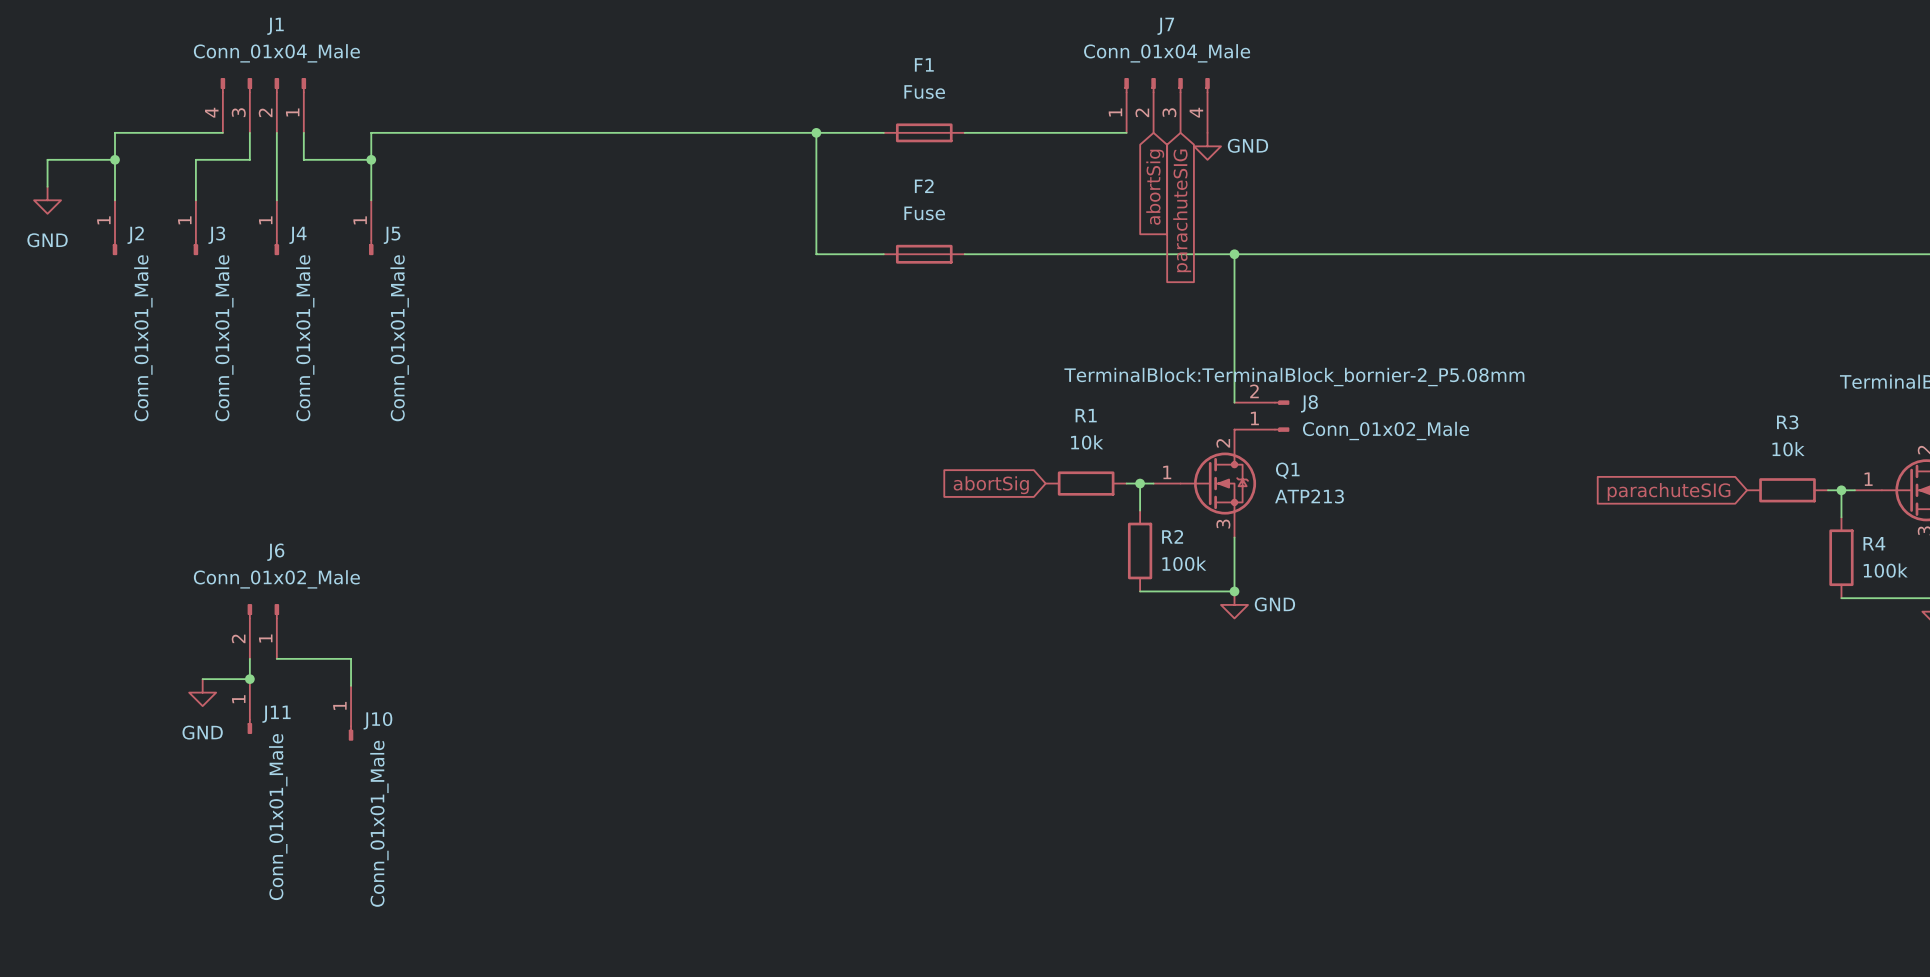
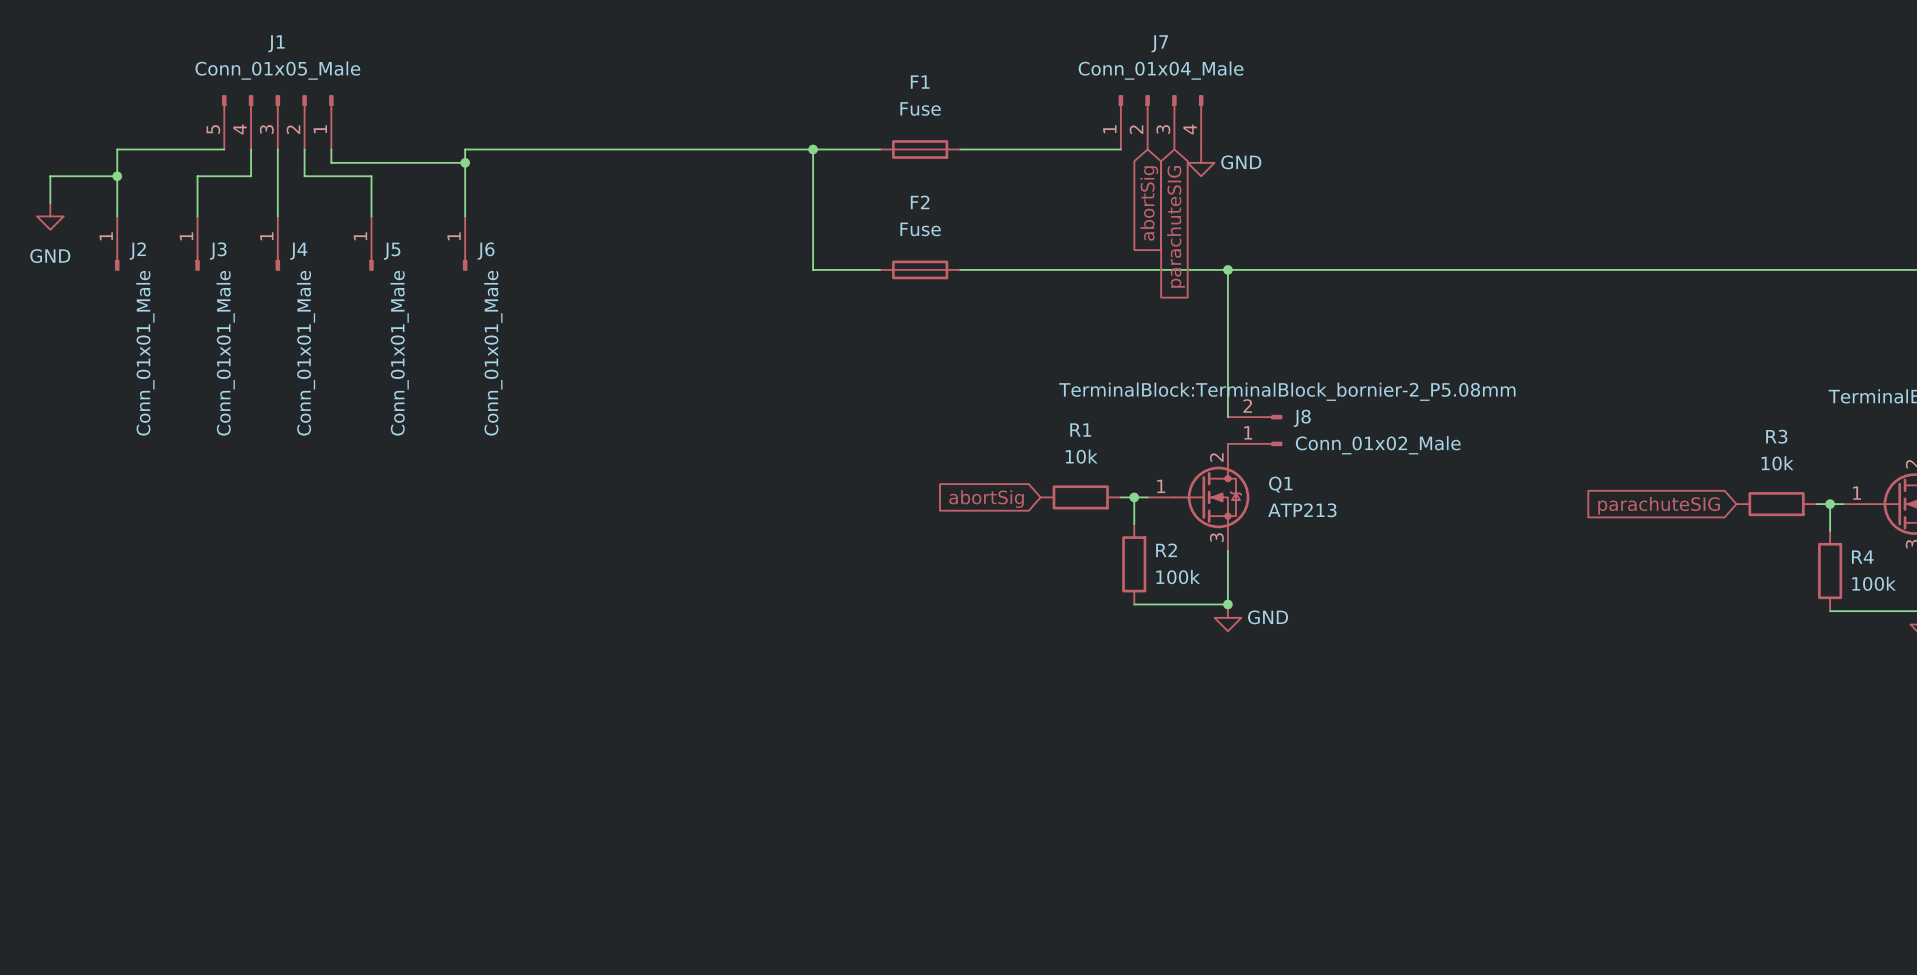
J1 value: Conn_01x04_Male (276, 53) -> Conn_01x05_Male (277, 70)
J1 symbol: [220, 78, 306, 133] -> [222, 95, 334, 150]
wire: none -> (331, 149) (331, 162) (465, 162)
wire: (465, 132) (371, 132) (371, 159) -> (465, 149) (465, 216)
junction: none -> (465, 162)
junction: (371, 159) -> none
J6 name position: J6 (275, 552) -> J6 (486, 251)
J6 value: Conn_01x02_Male (276, 579) -> Conn_01x01_Male (493, 353)
J6 symbol: [247, 604, 280, 659] -> [463, 216, 468, 271]
wire: (249, 658) (249, 679) (202, 679) -> none
wire: (276, 658) (351, 658) (351, 685) -> none
junction: (249, 679) -> none
power symbol: GND (202, 692) -> none
J11: Conn_01x01_Male (249, 706) -> none
J10: Conn_01x01_Male (351, 713) -> none

